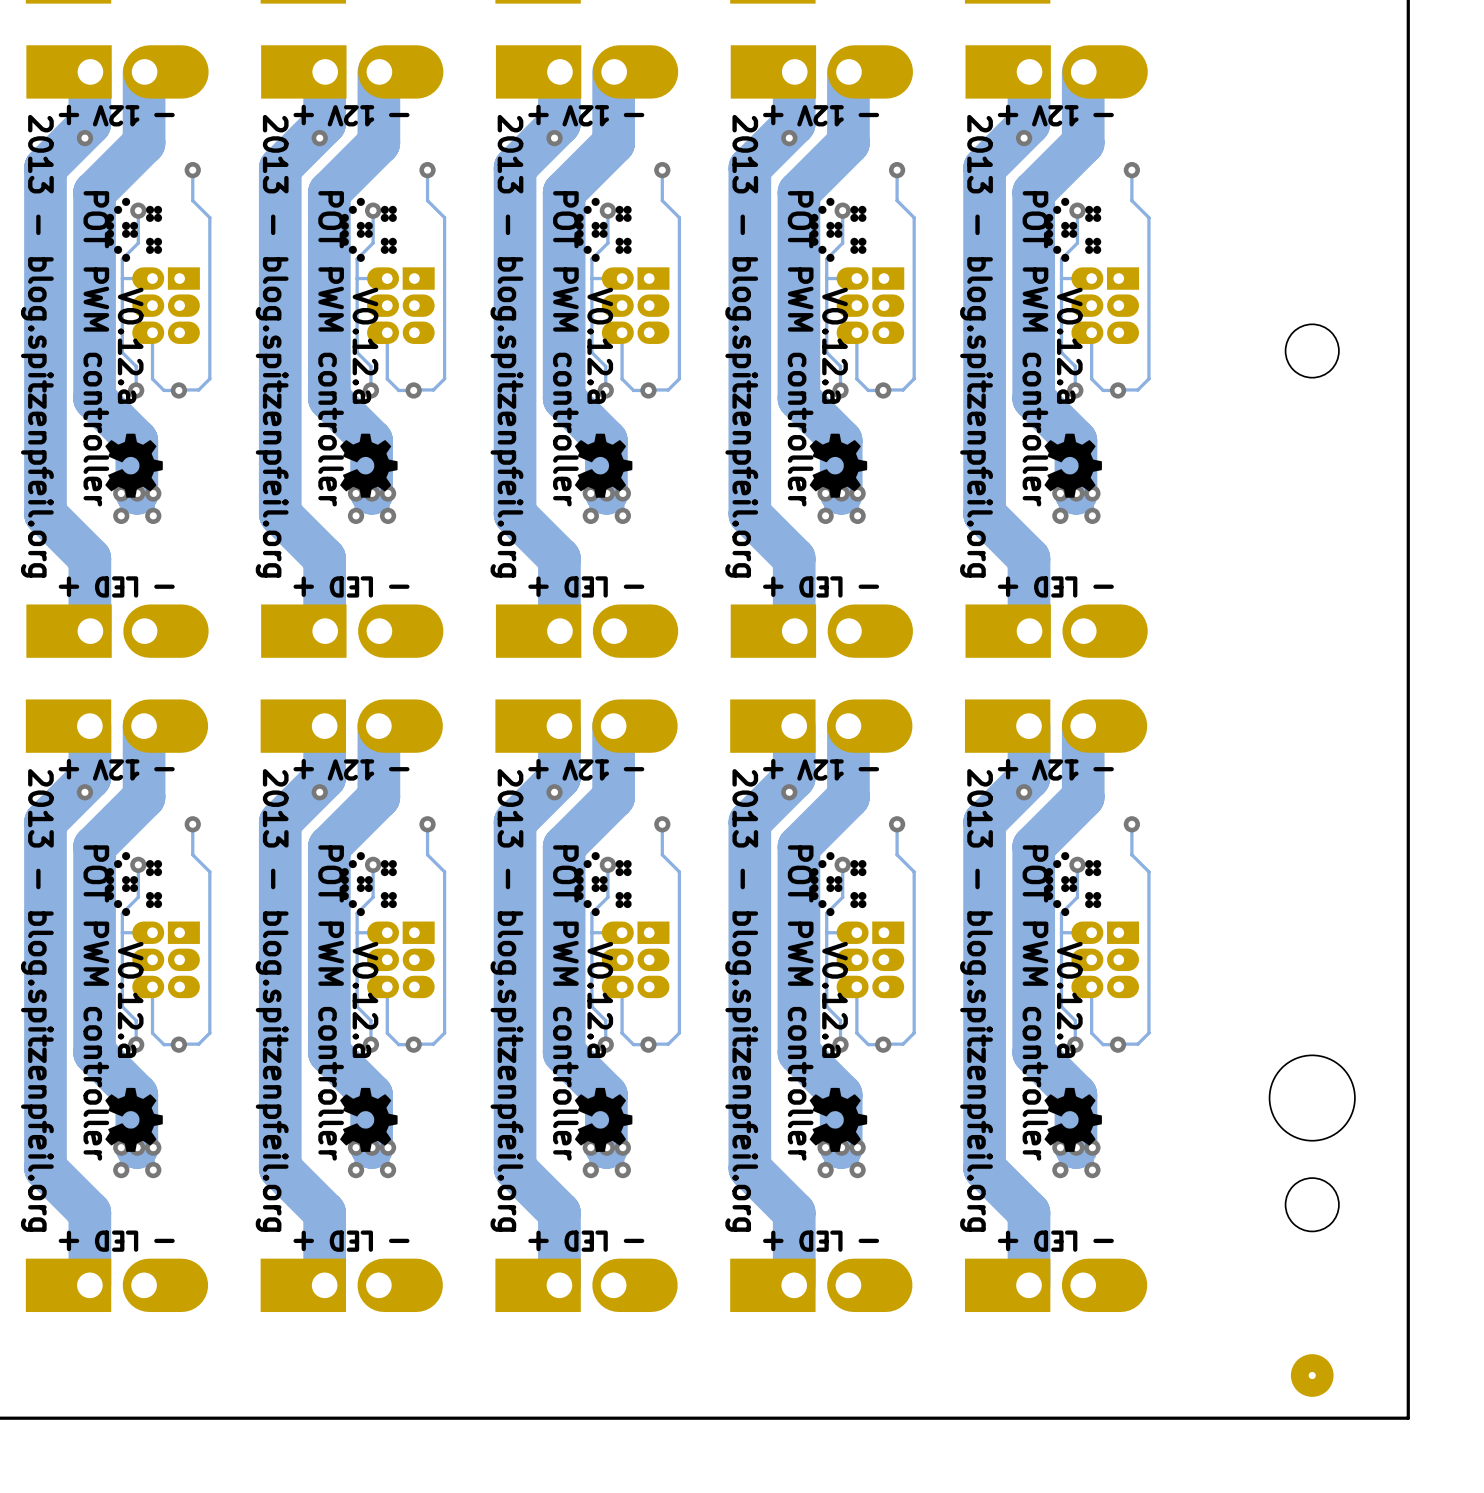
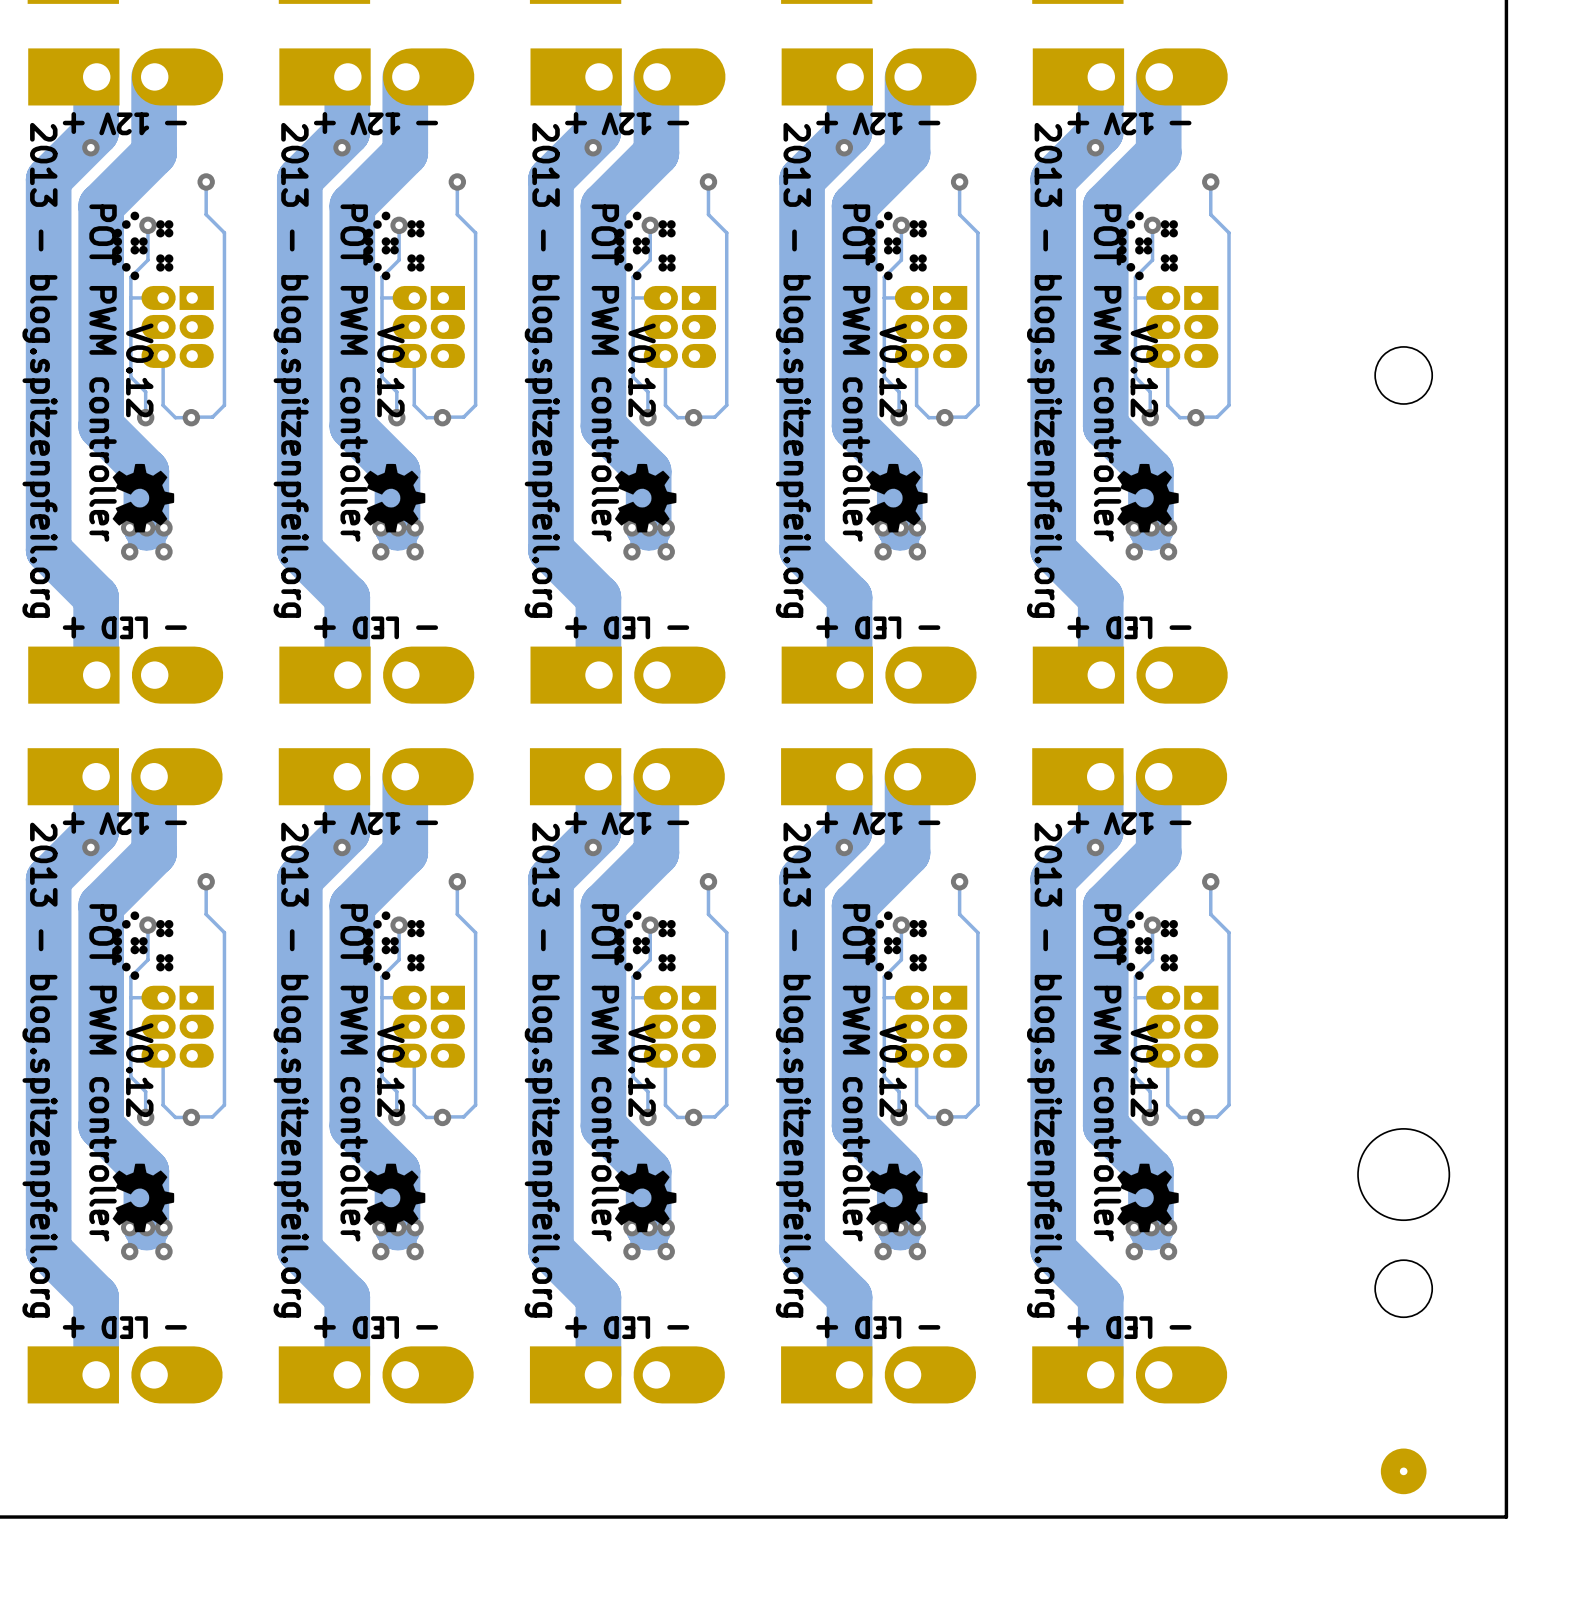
text: V0.12.a (130, 345) -> V0.12 (139, 370)
text: V0.12.a (365, 345) -> V0.12 (390, 370)
text: V0.12.a (600, 345) -> V0.12 (642, 370)
text: V0.12.a (835, 345) -> V0.12 (893, 370)
text: V0.12.a (1069, 345) -> V0.12 (1144, 370)
text: V0.12.a (130, 999) -> V0.12 (139, 1070)
text: V0.12.a (365, 999) -> V0.12 (390, 1070)
text: V0.12.a (600, 999) -> V0.12 (642, 1070)
text: V0.12.a (835, 999) -> V0.12 (893, 1070)
text: V0.12.a (1069, 999) -> V0.12 (1144, 1070)

